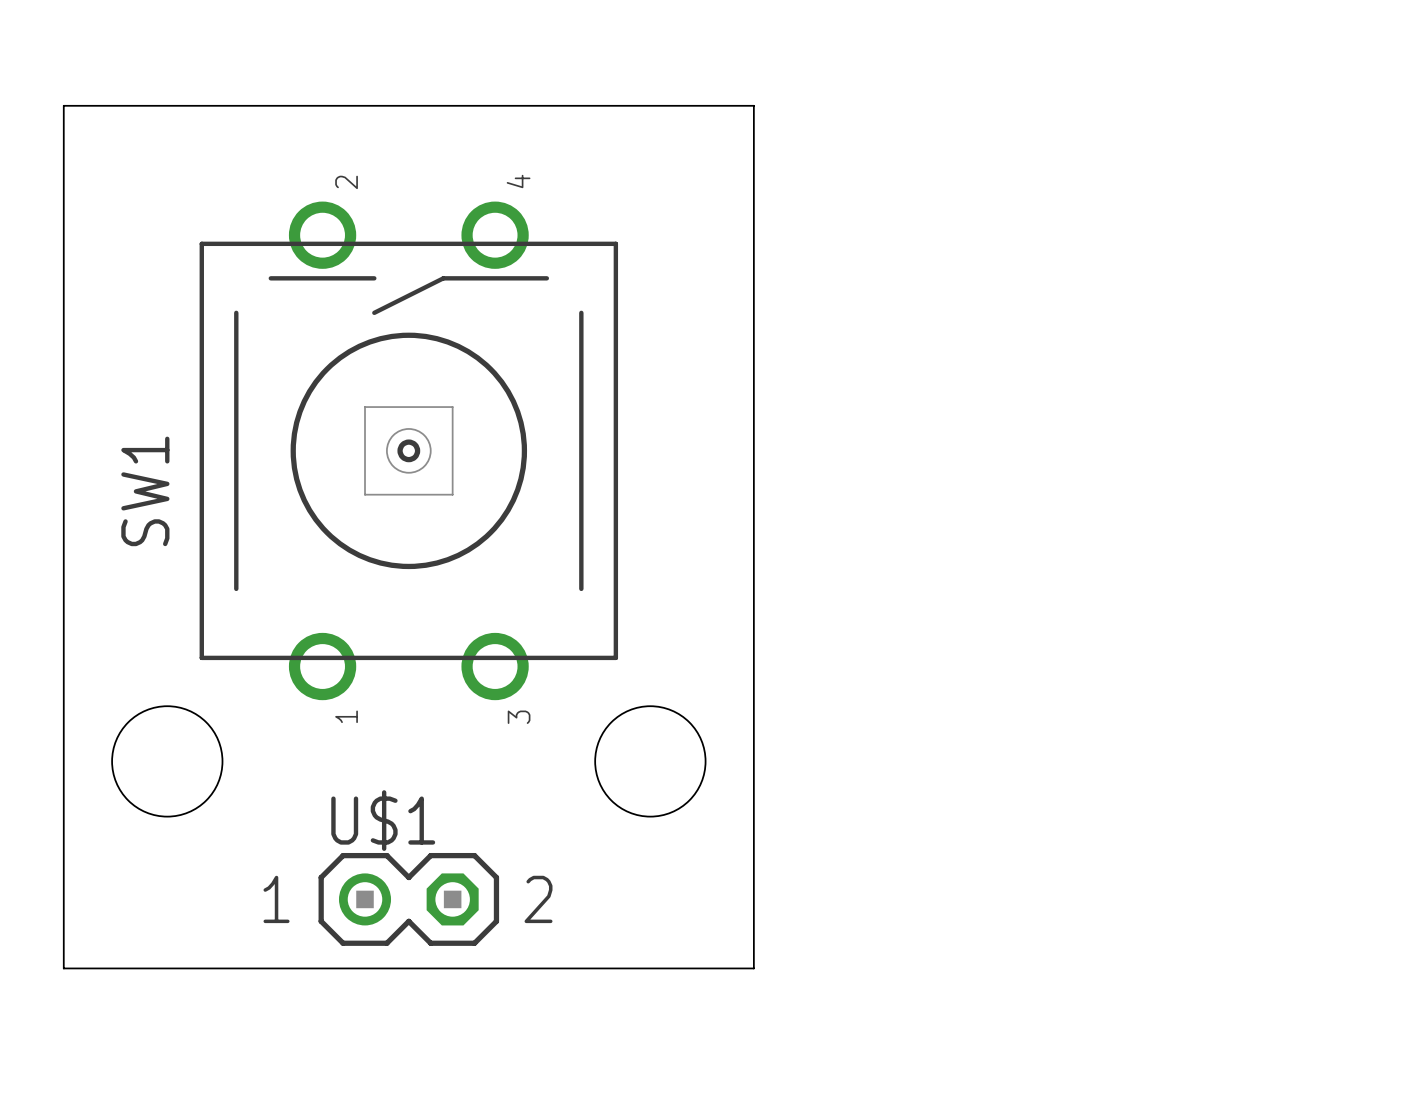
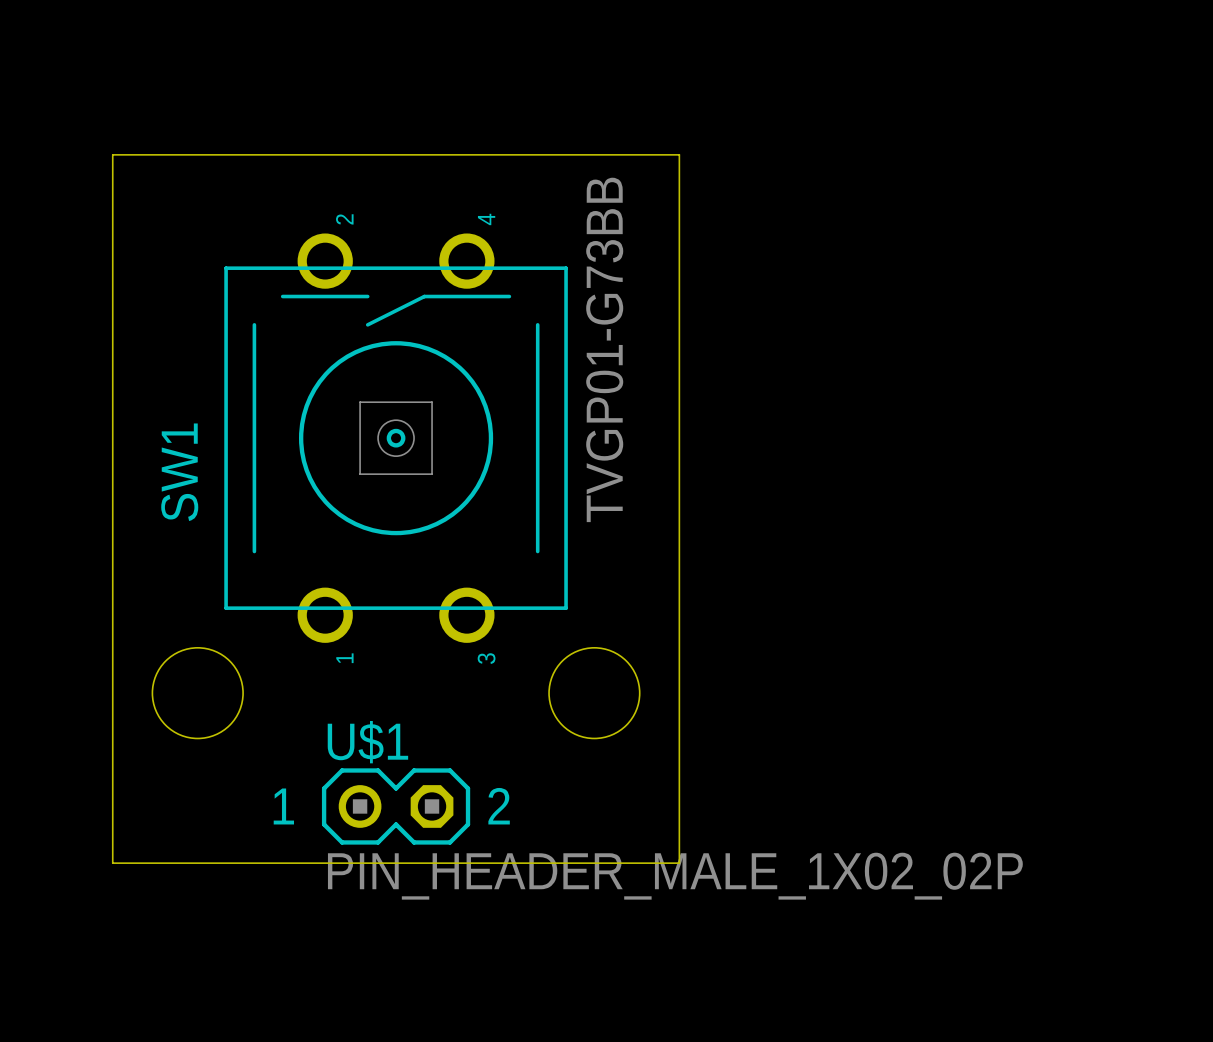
SW1 value: none -> TVGP01-G73BB (604, 349)
U$1 value: none -> PIN_HEADER_MALE_1X02_02P (675, 876)

